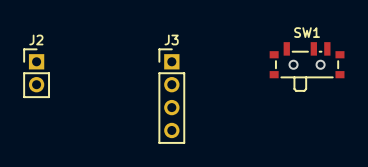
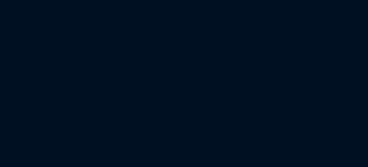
SW1: (307, 66) -> none
J2: (36, 73) -> none
J3: (171, 96) -> none

